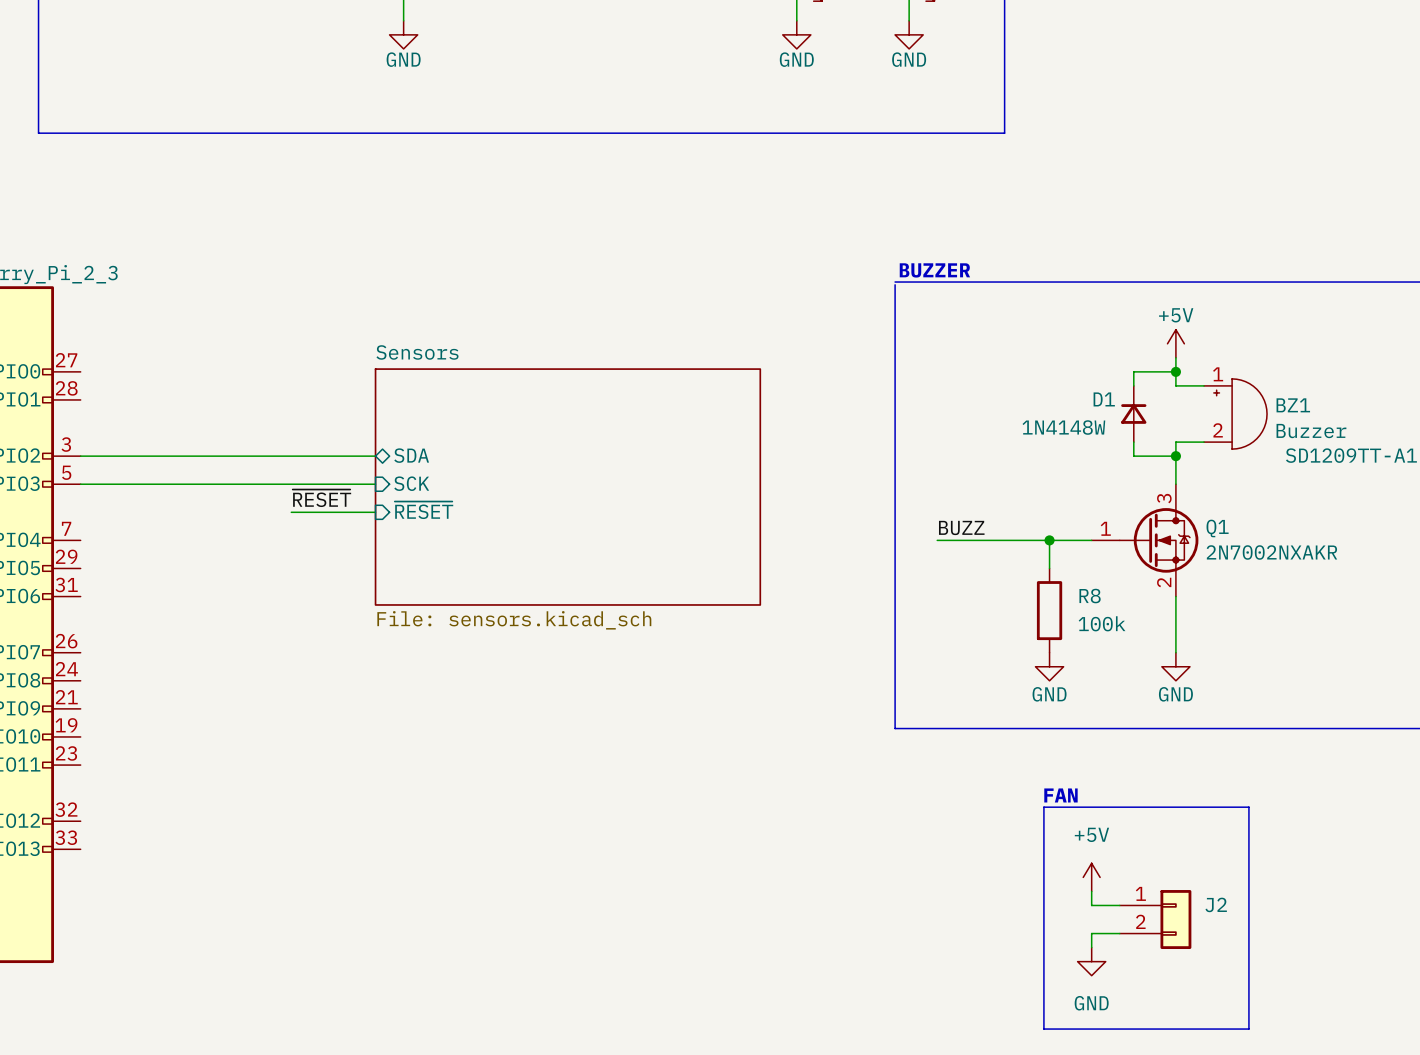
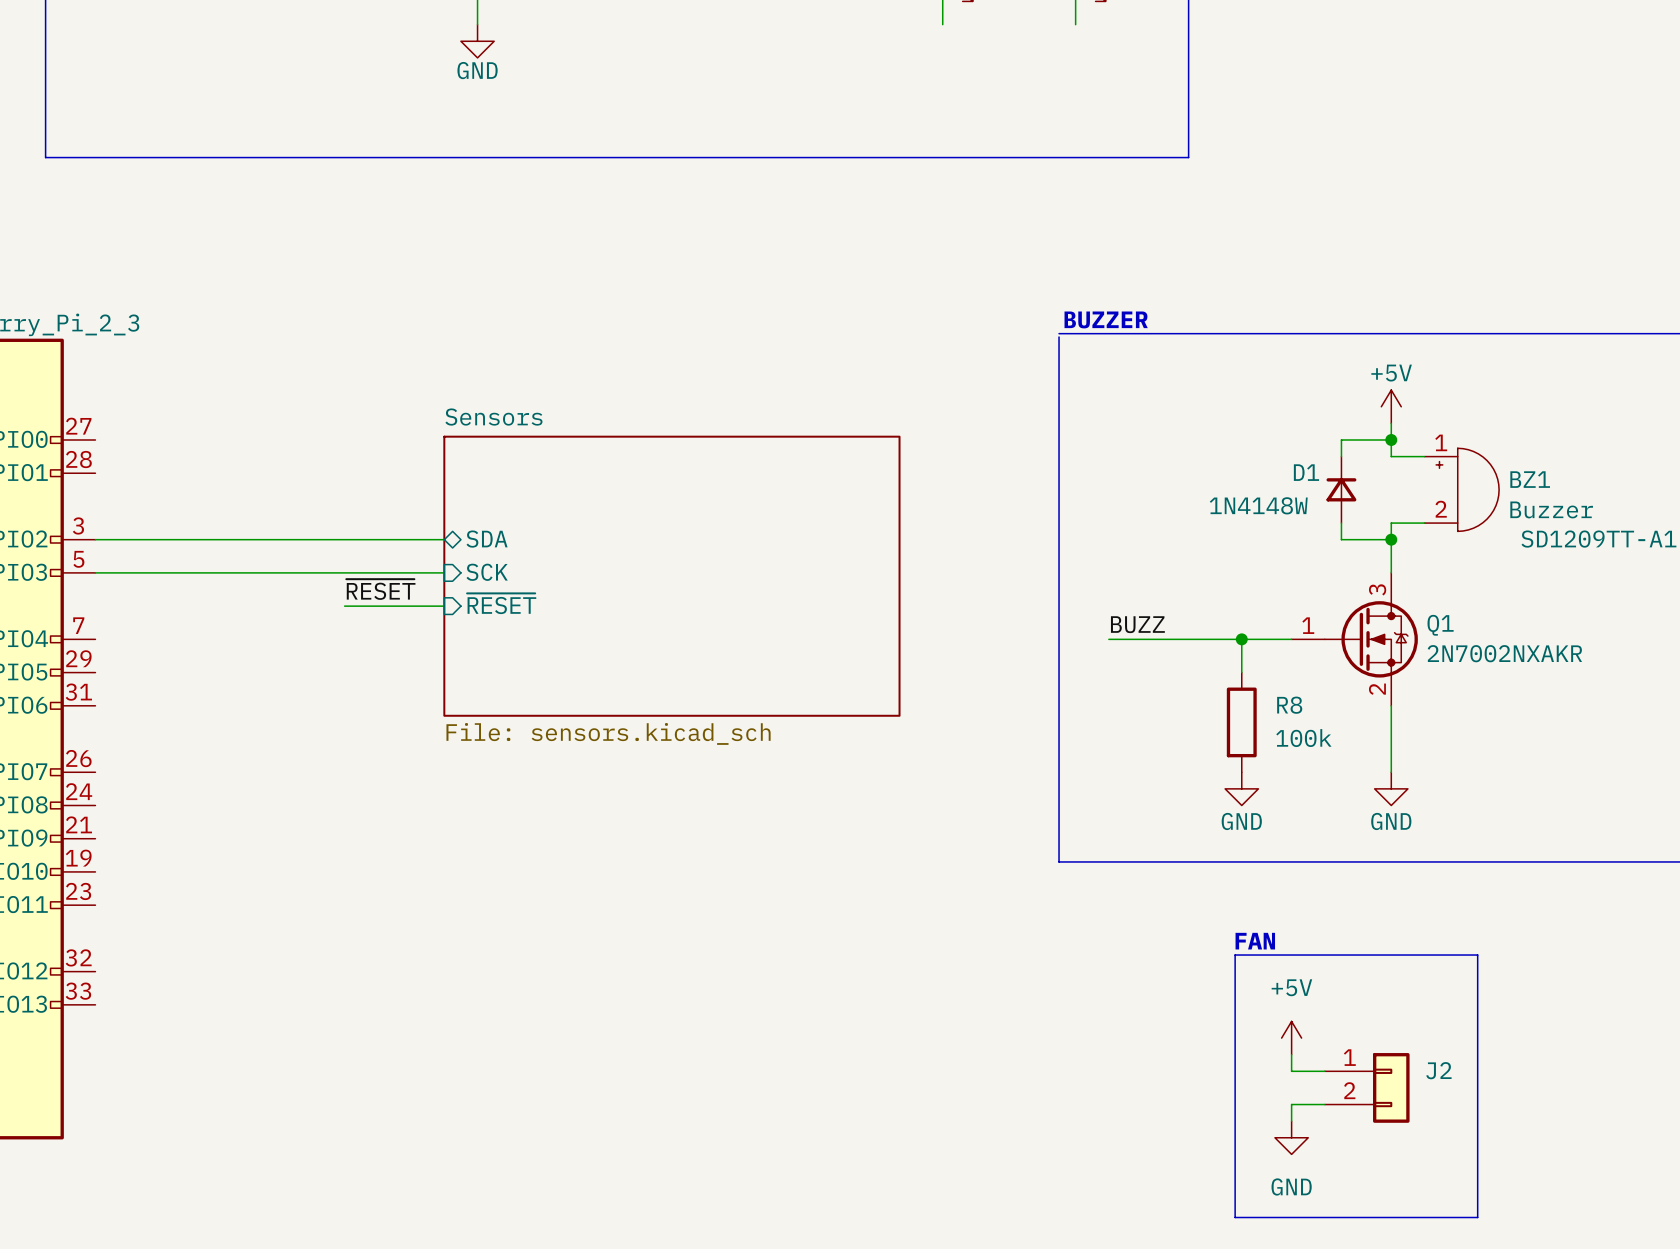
power symbol: GND (796, 34) -> none
power symbol: GND (909, 34) -> none

